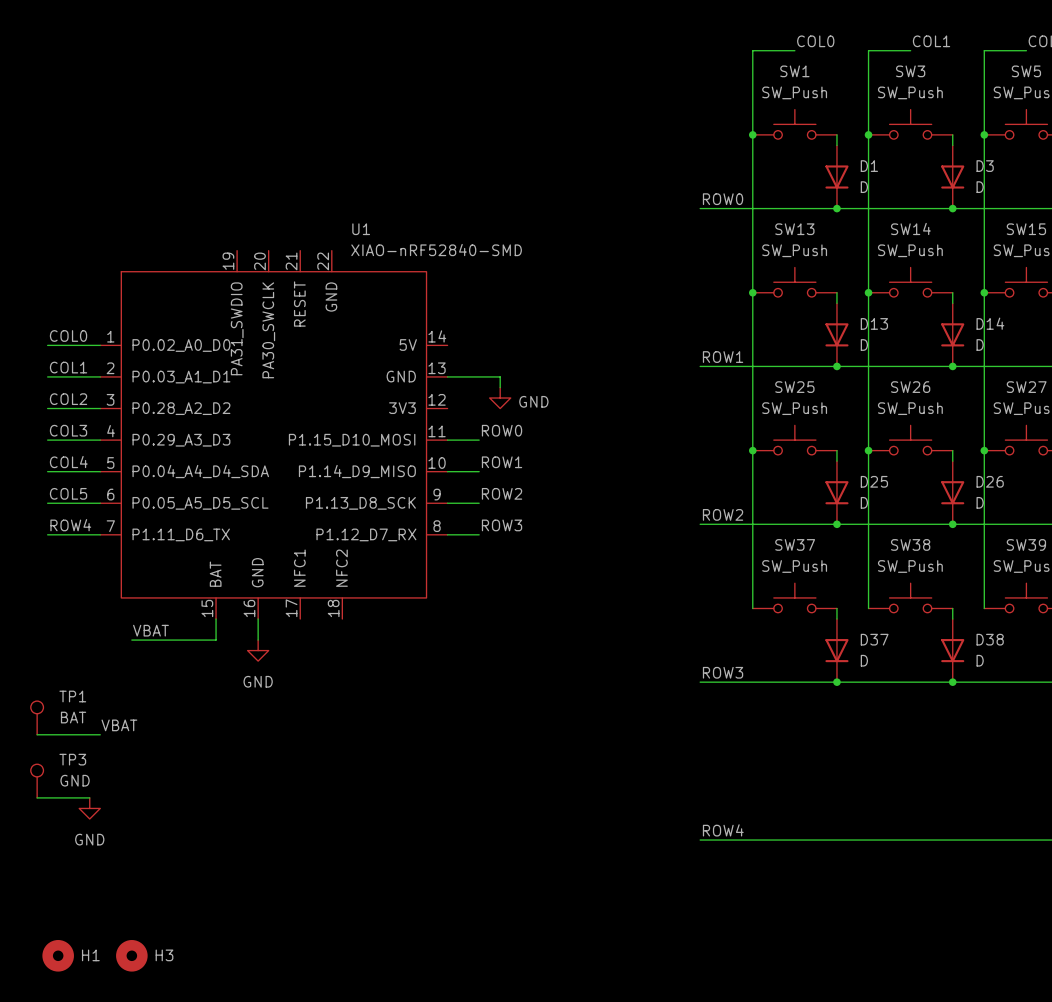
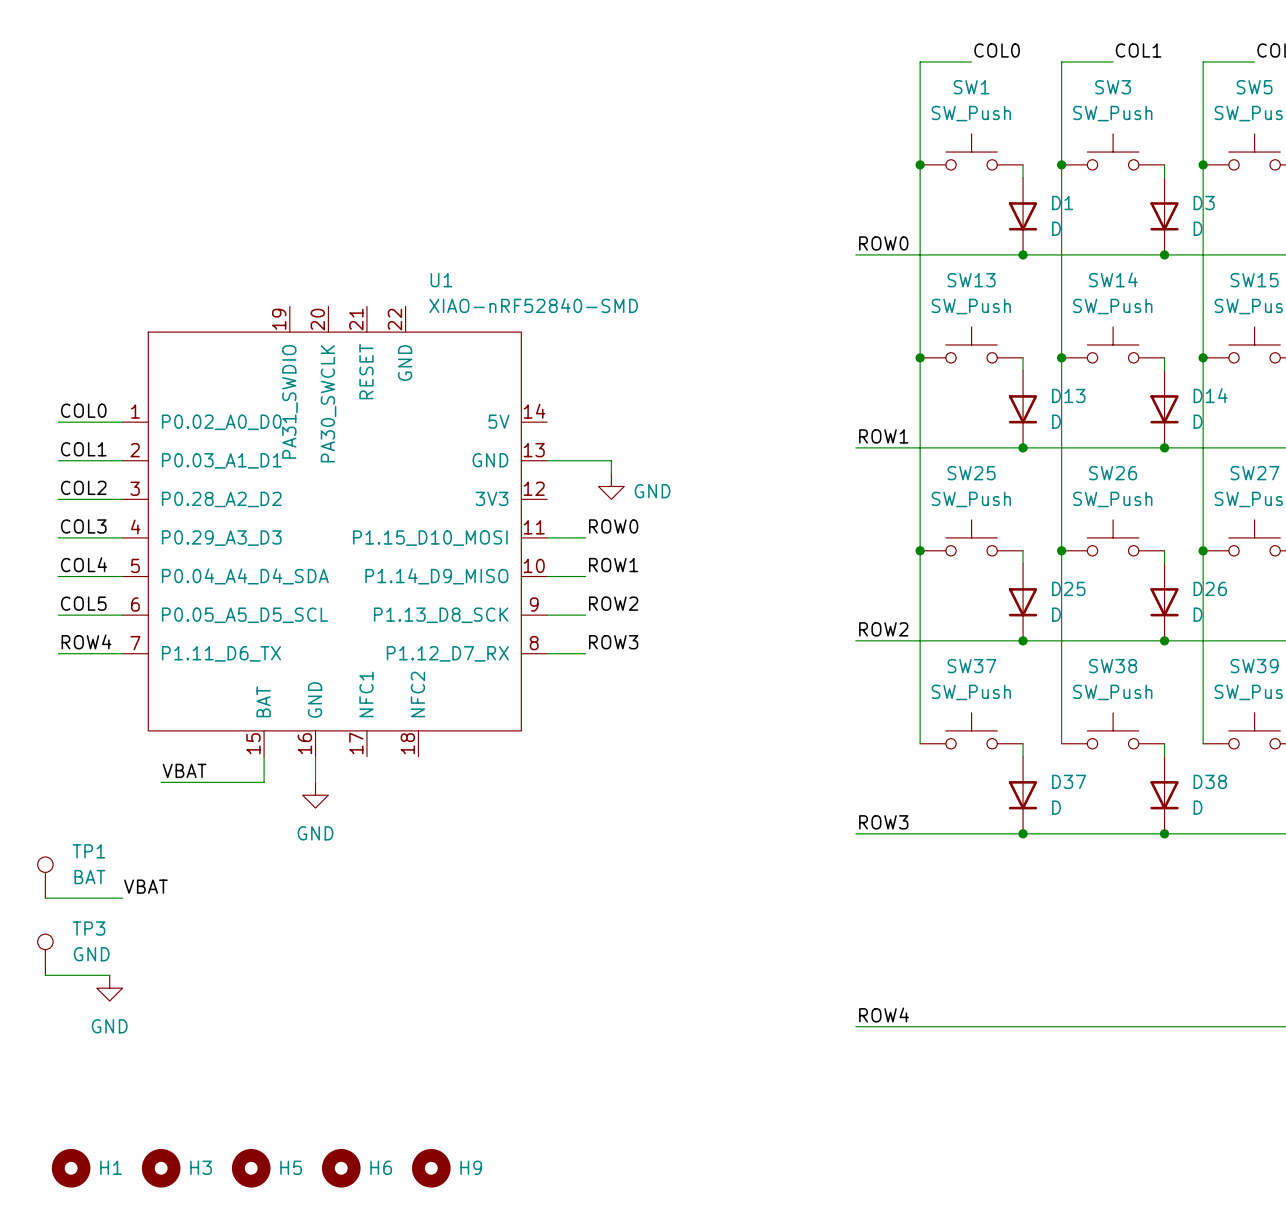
H5: none -> (251, 1168)
H6: none -> (341, 1168)
H9: none -> (431, 1168)

